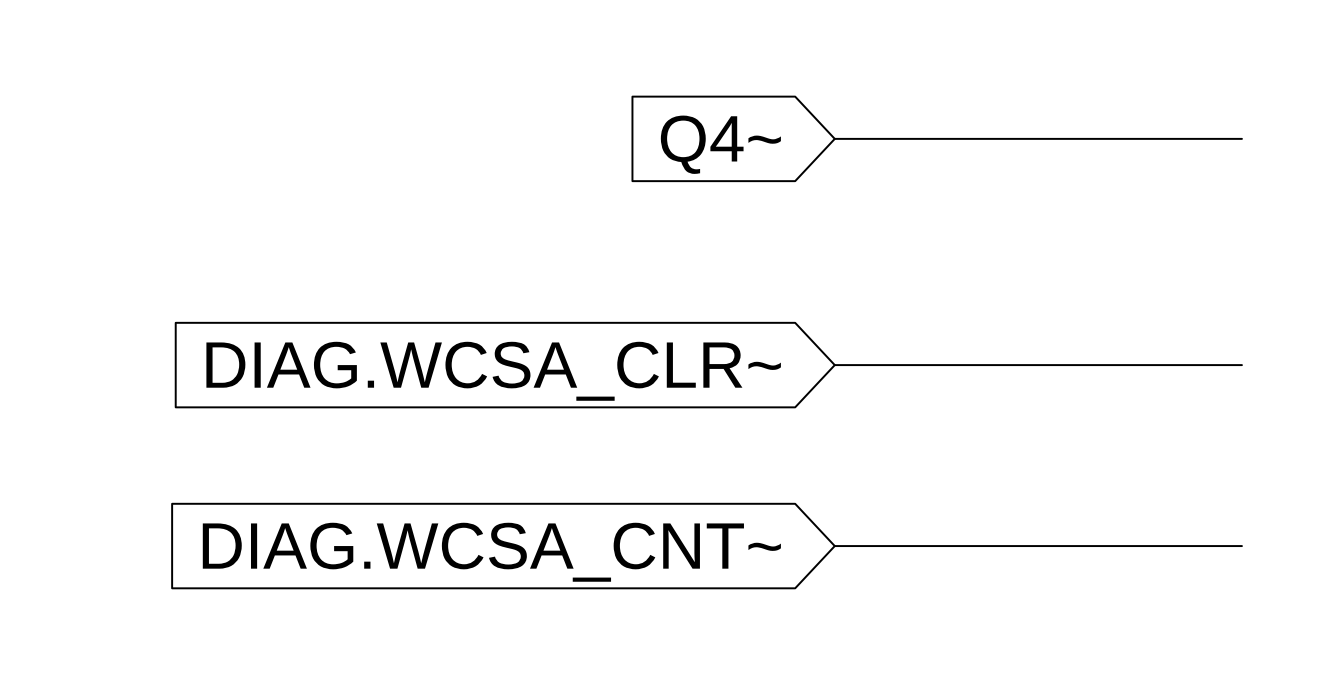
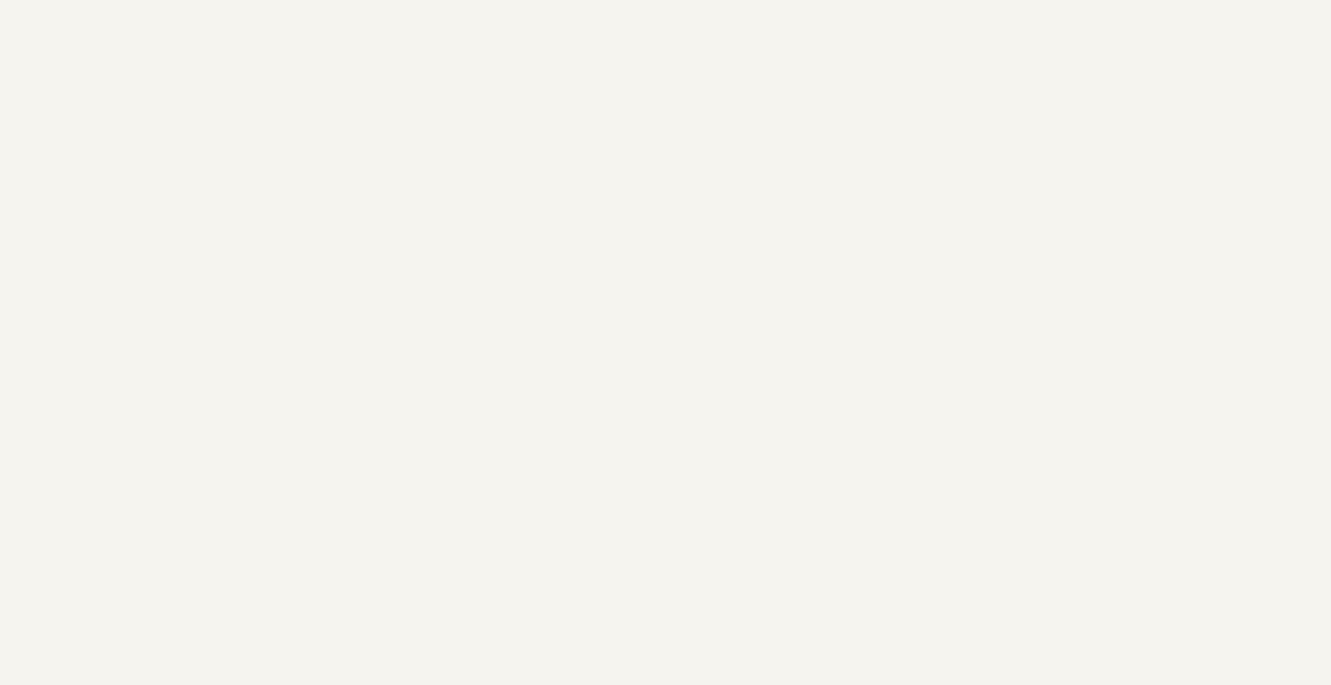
wire: (834, 138) (1241, 138) -> none
global label: Q4~ (720, 144) -> none
wire: (834, 365) (1241, 365) -> none
global label: DIAG.WCSA_CLR~ (493, 371) -> none
wire: (834, 546) (1241, 546) -> none
global label: DIAG.WCSA_CNT~ (491, 552) -> none

